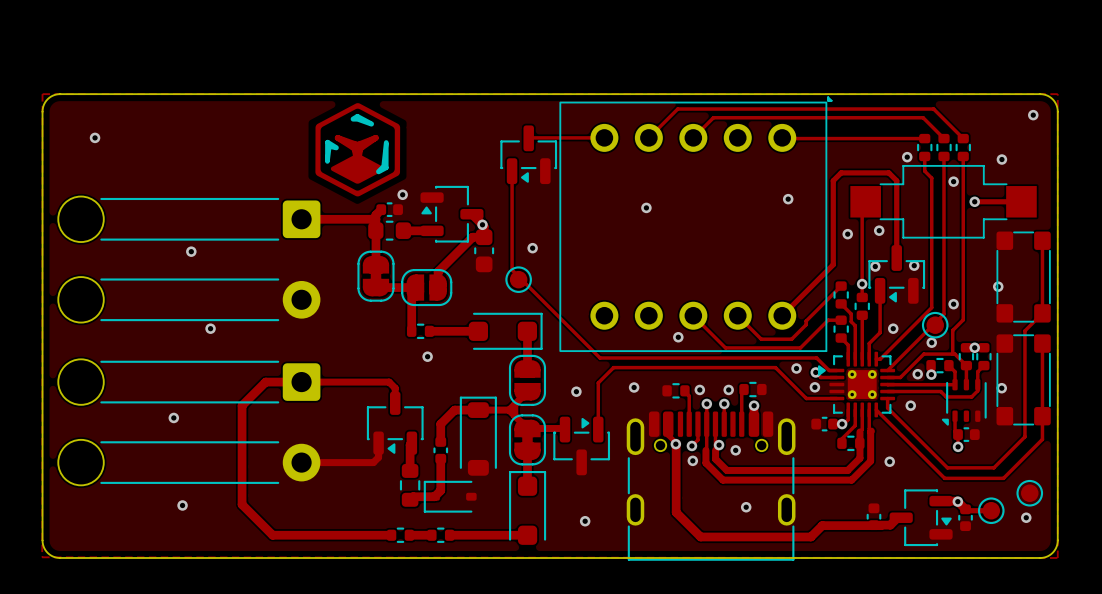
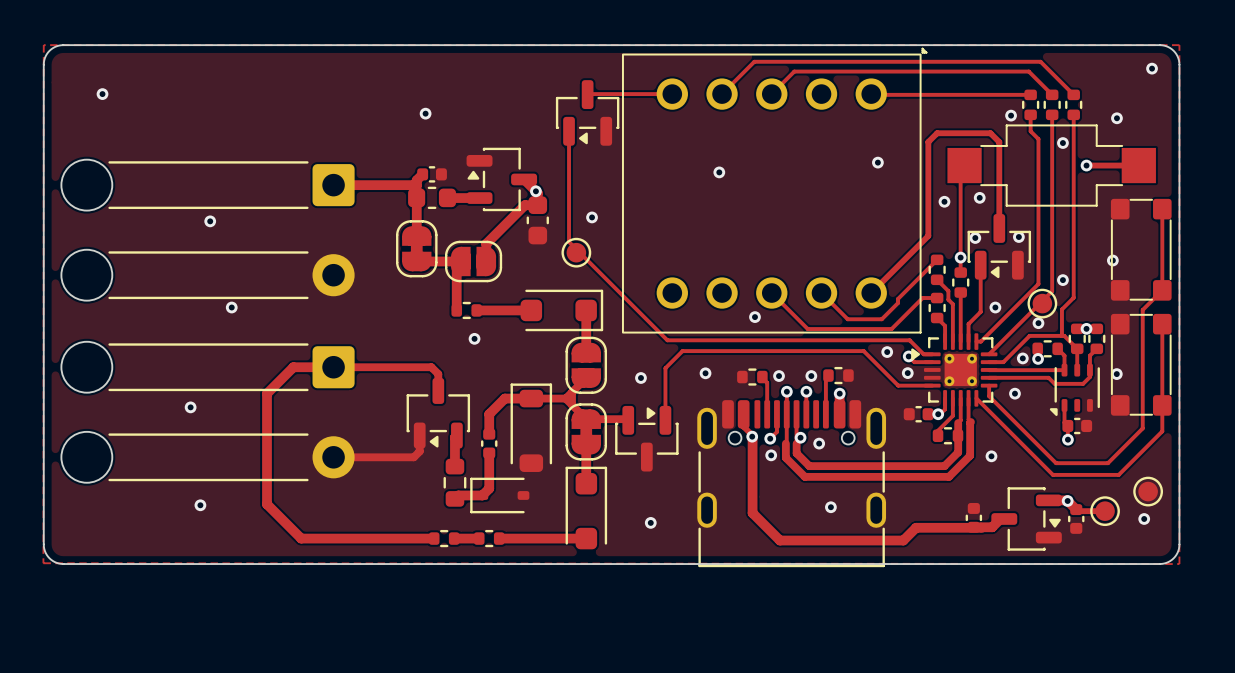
drawing: [315, 103, 401, 197] -> none
via position: (402, 194) -> (425, 113)

